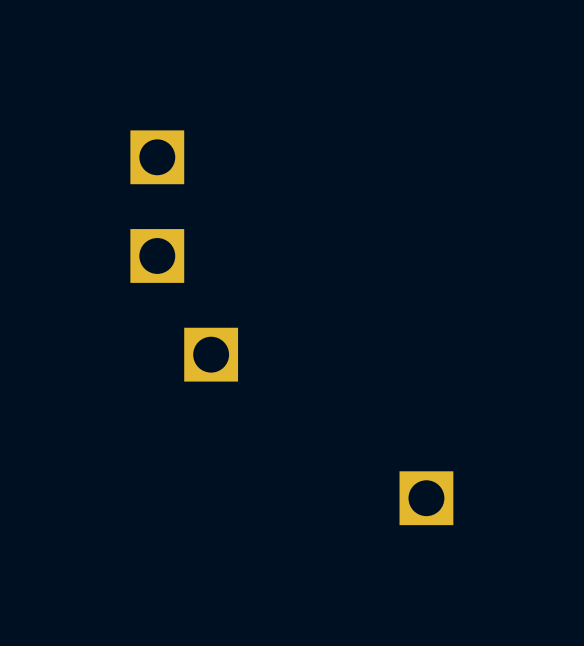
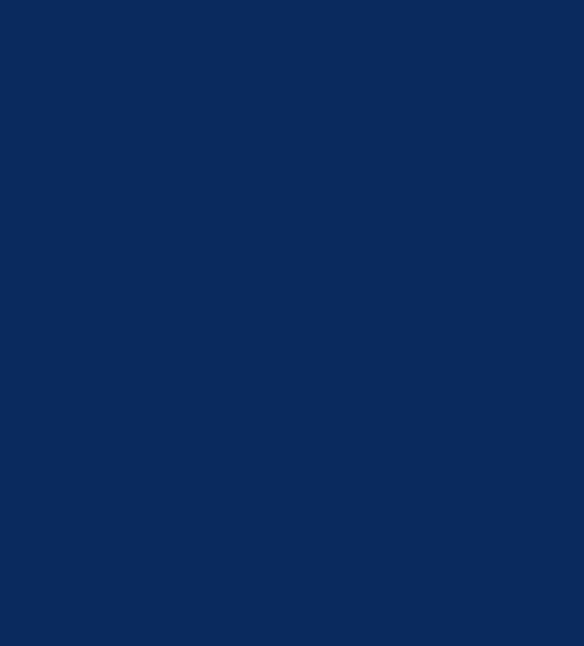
part: (157, 157) -> none
part: (157, 255) -> none
part: (211, 354) -> none
part: (426, 498) -> none

